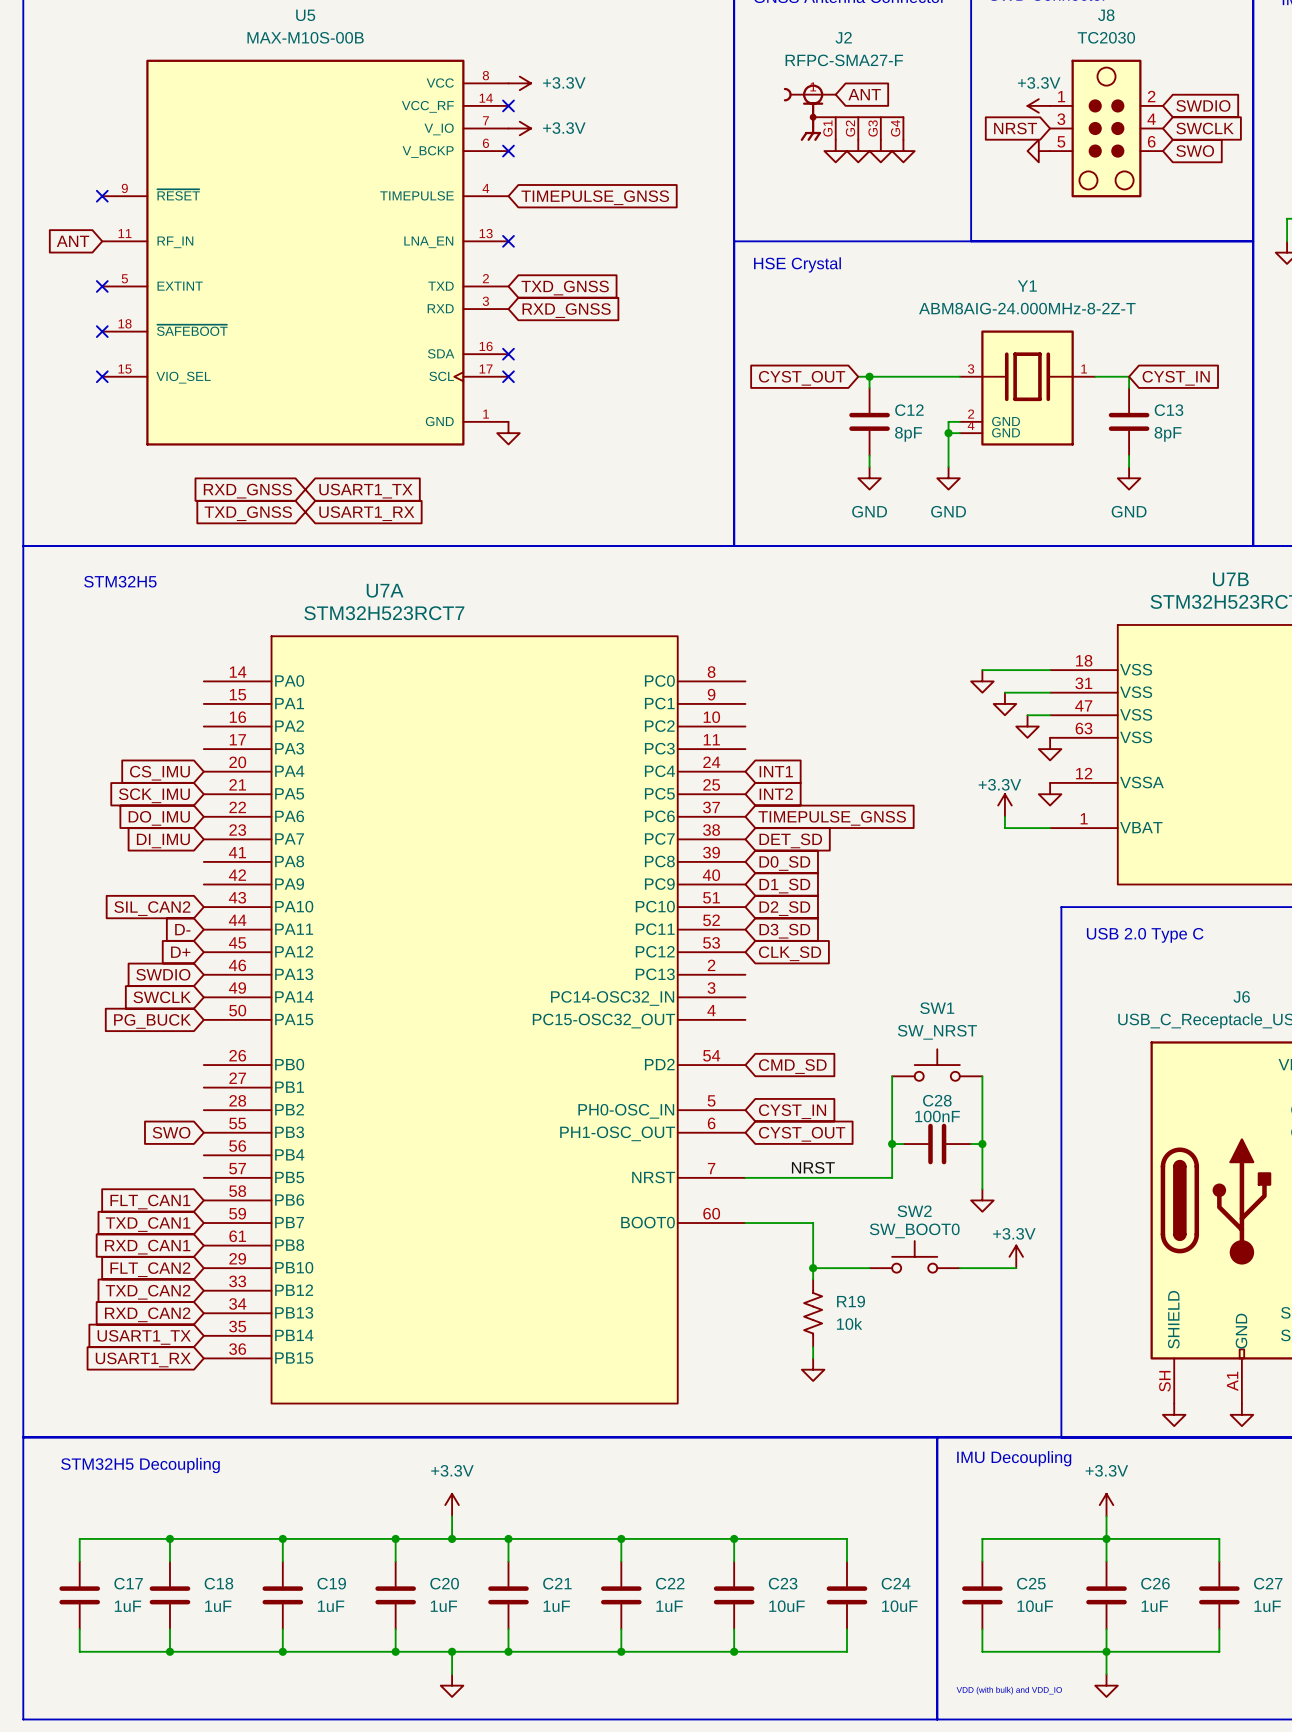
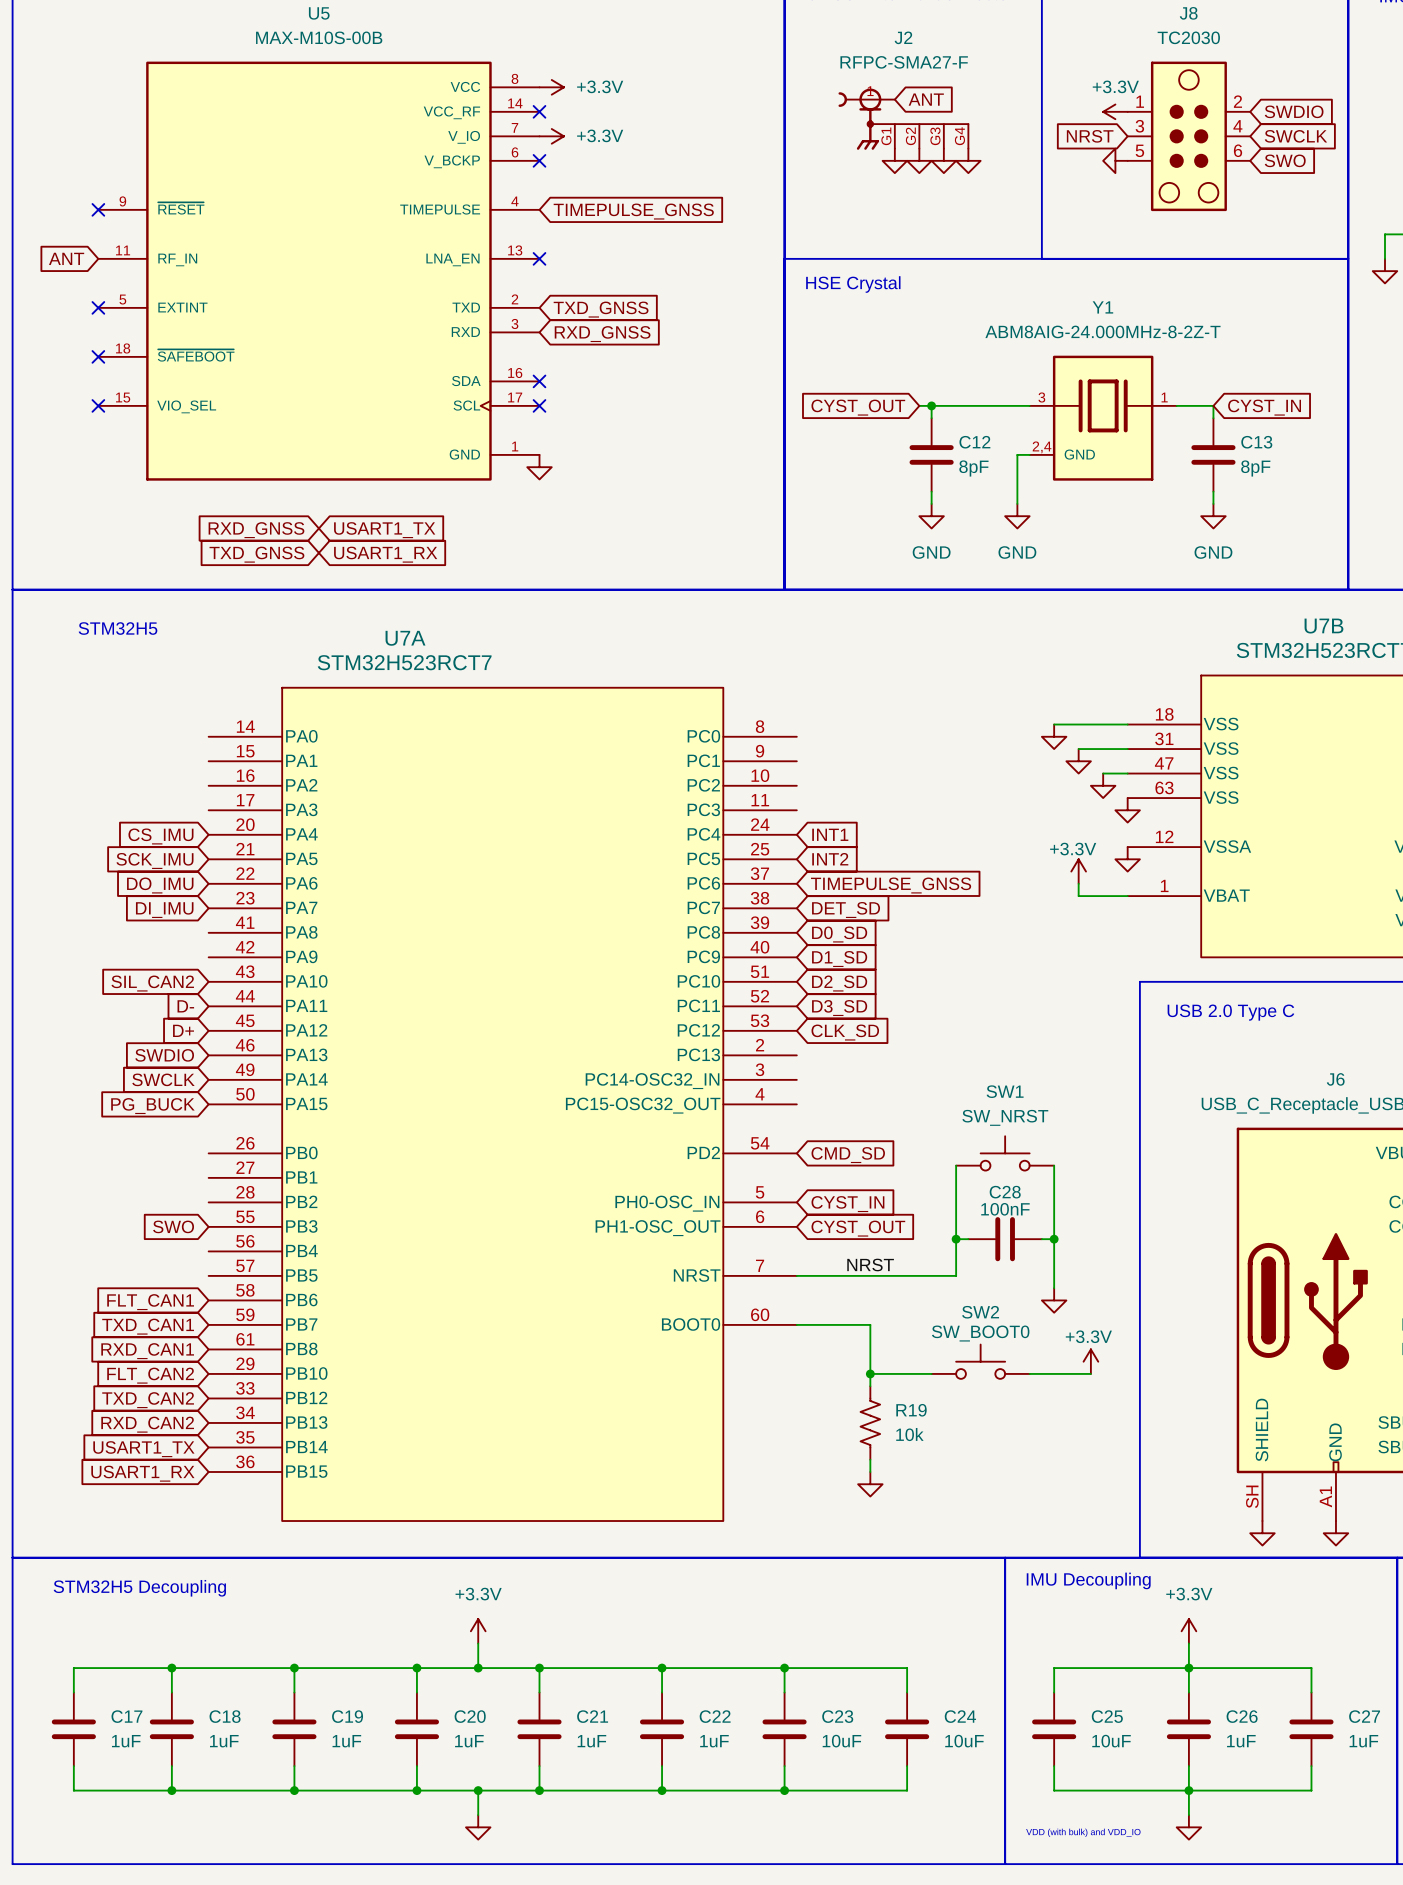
Y1 symbol: [959, 330, 1096, 446] -> [1029, 355, 1177, 481]
wire: (948, 433) (959, 433) -> none
junction: (948, 433) -> none

